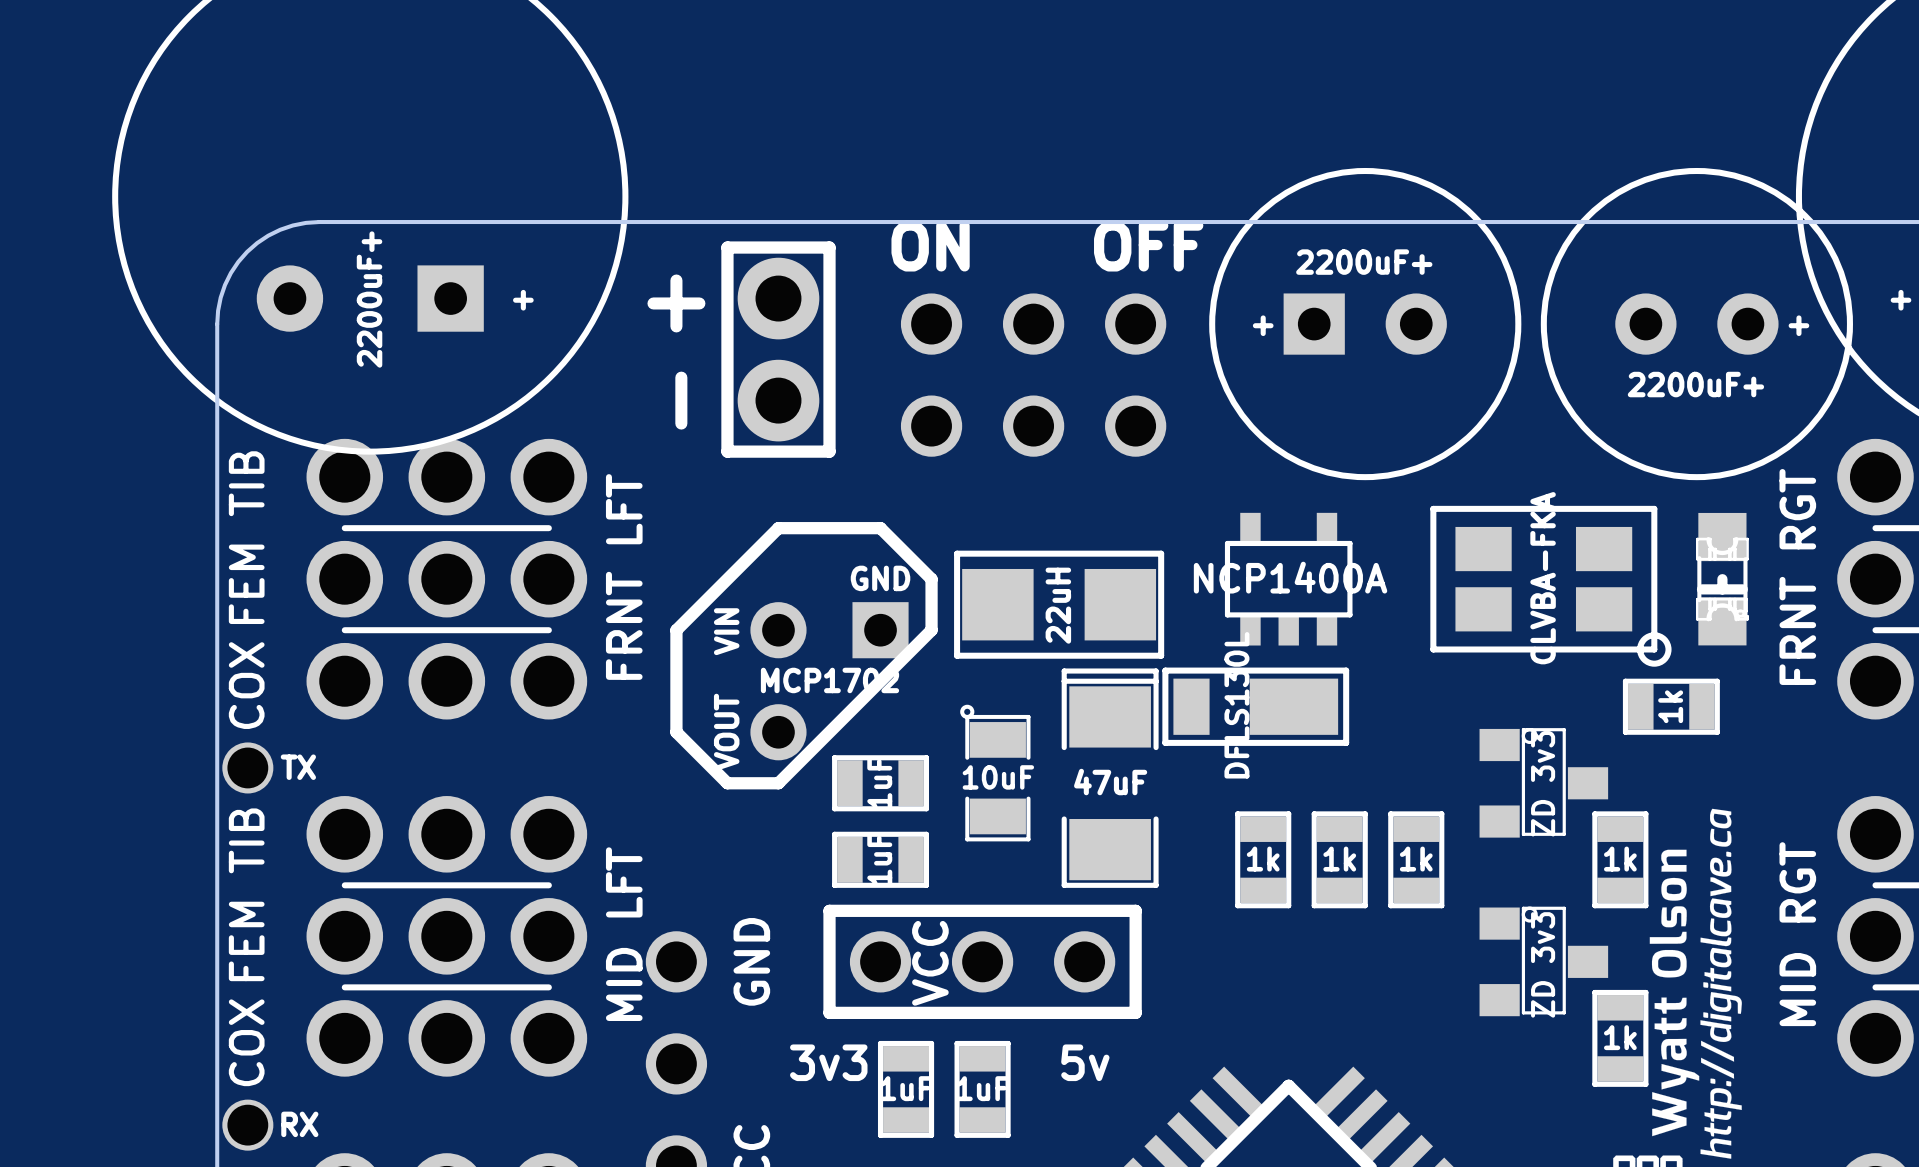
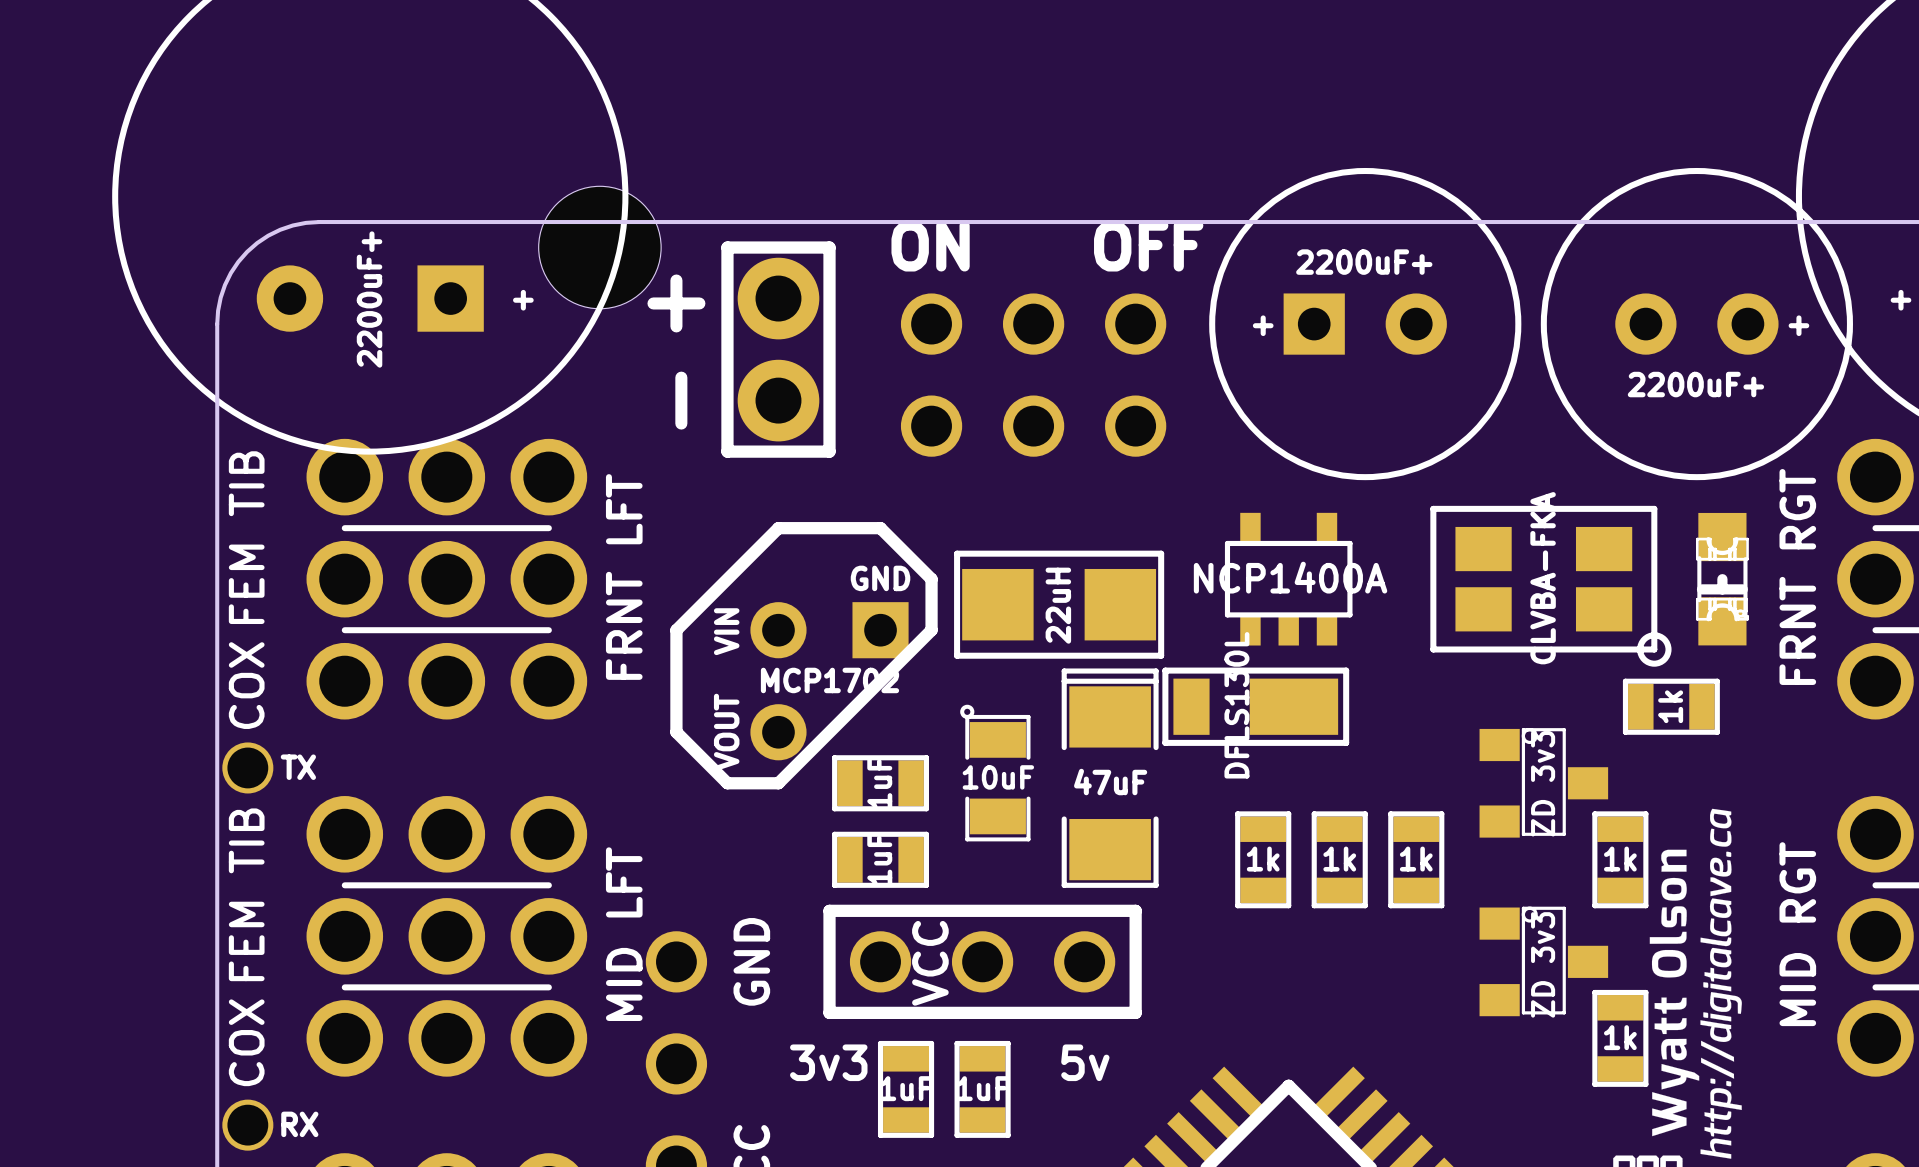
part: none -> (599, 247)

